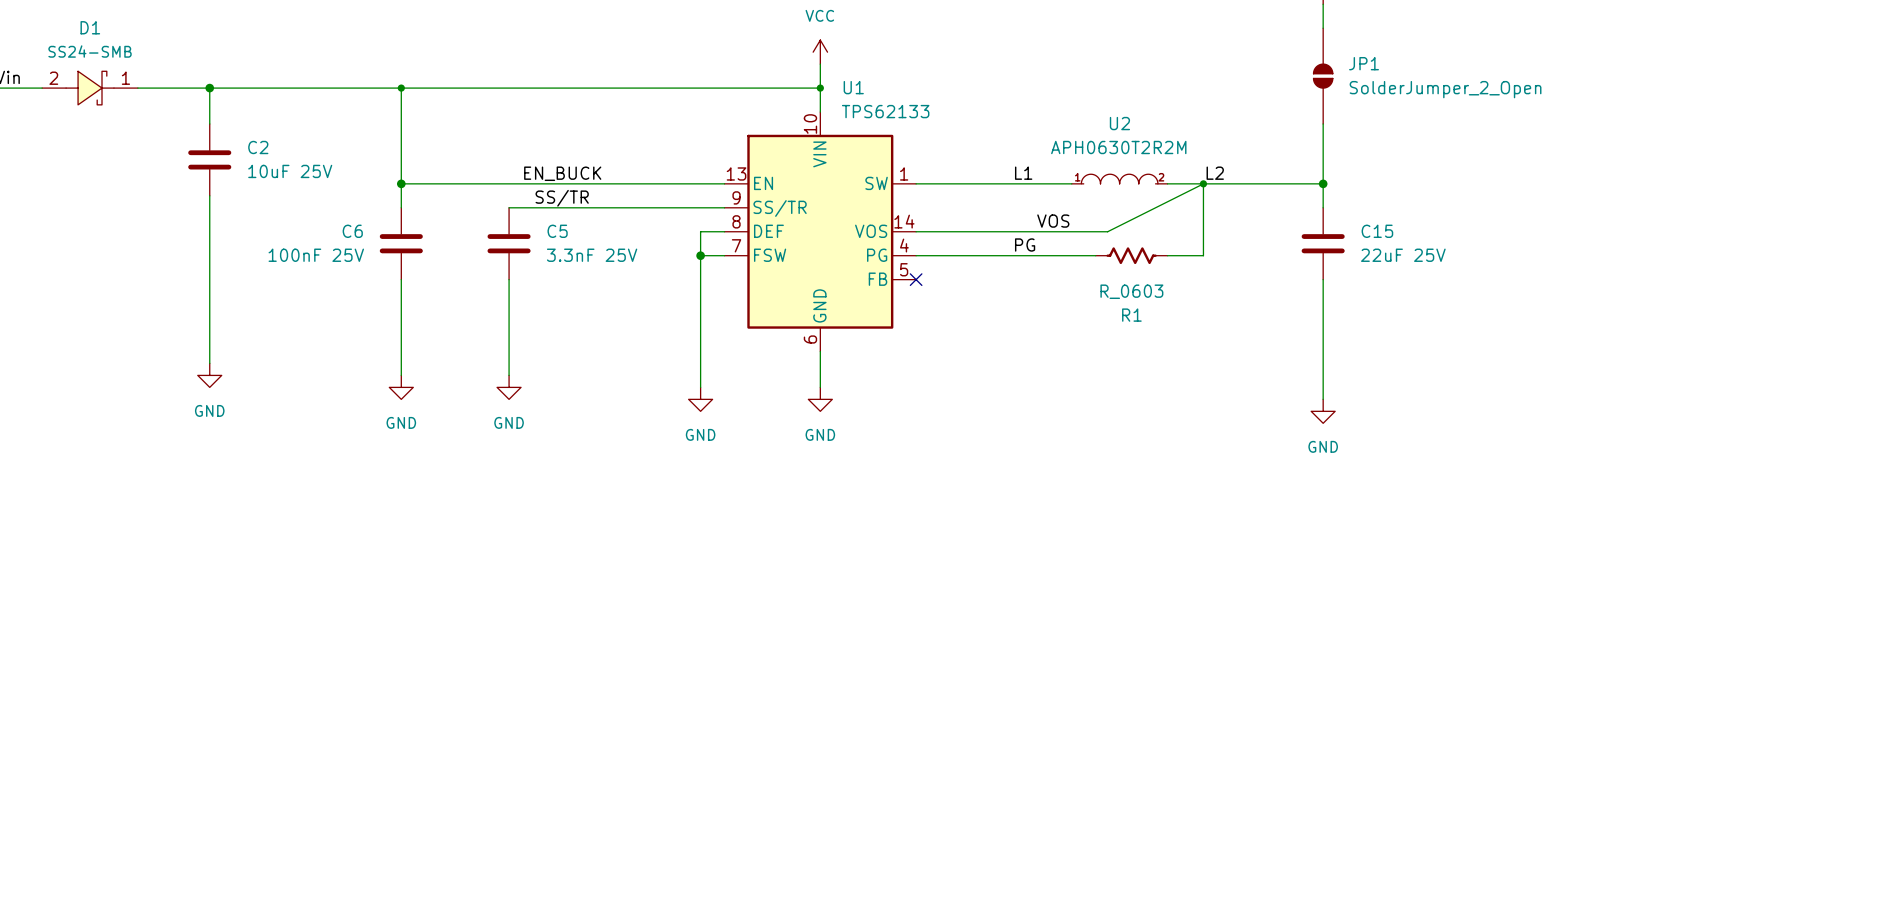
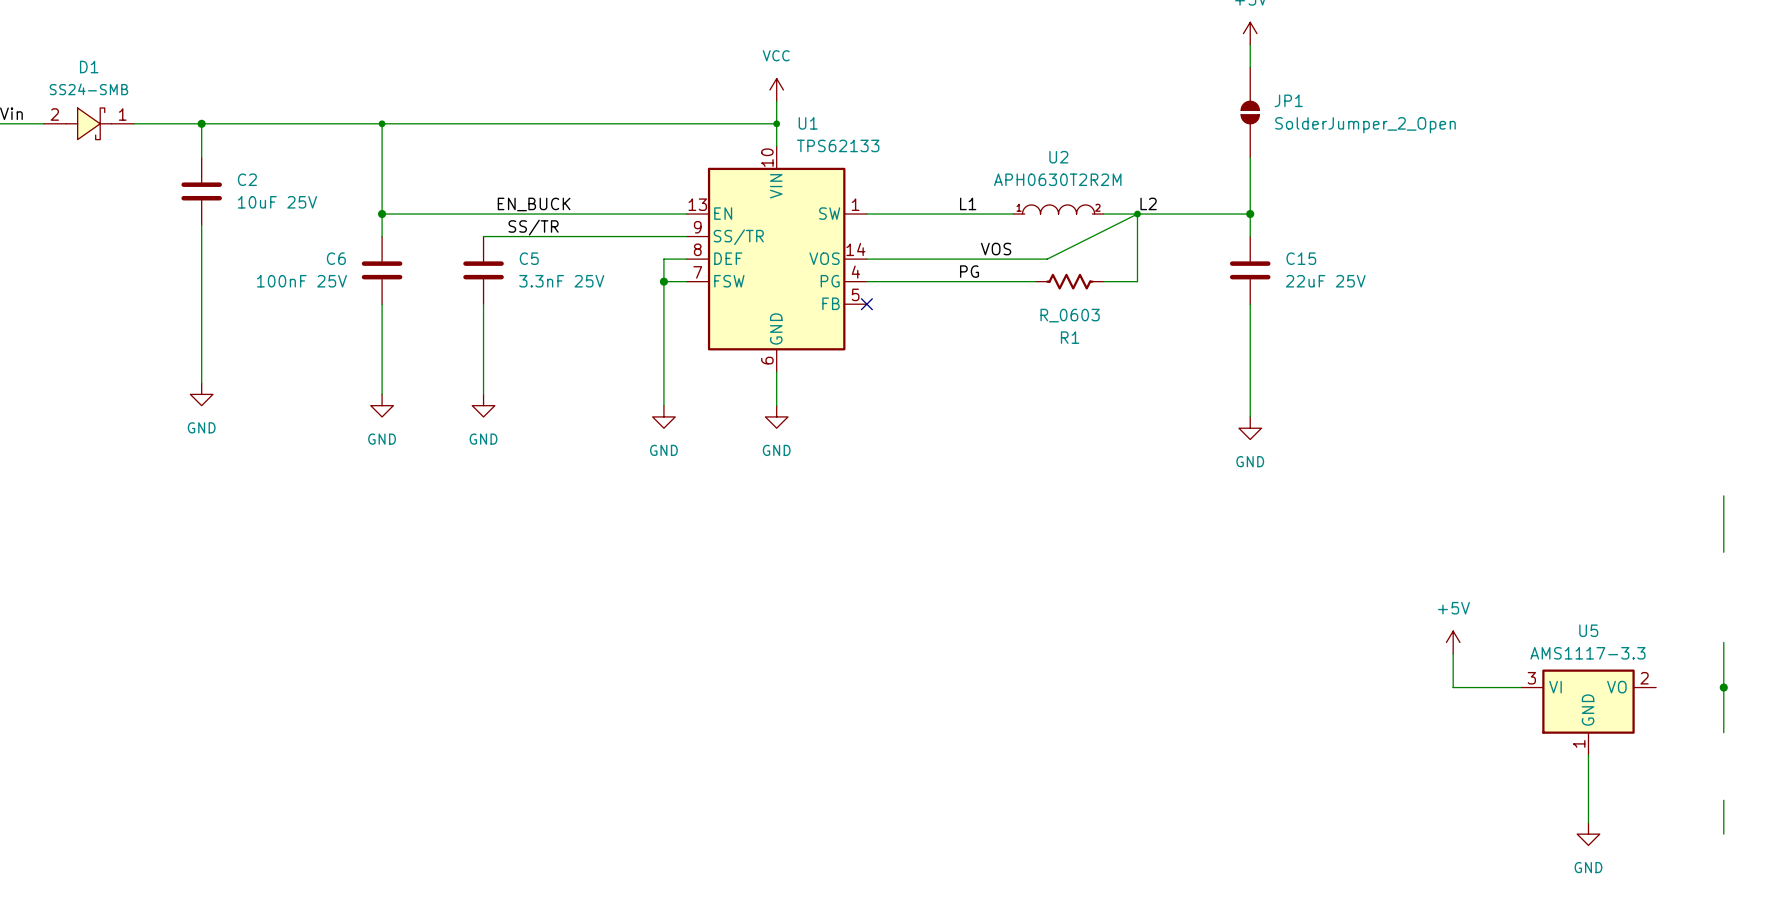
wire: none -> (1723, 495) (1723, 552)
power symbol: none -> +5V (1453, 642)
wire: none -> (1723, 642) (1723, 732)
wire: none -> (1453, 653) (1453, 687) (1520, 687)
junction: none -> (1723, 687)
U5: none -> AMS1117-3.3 (1588, 712)
wire: none -> (1588, 755) (1588, 822)
wire: none -> (1723, 800) (1723, 834)
power symbol: none -> GND (1588, 834)

